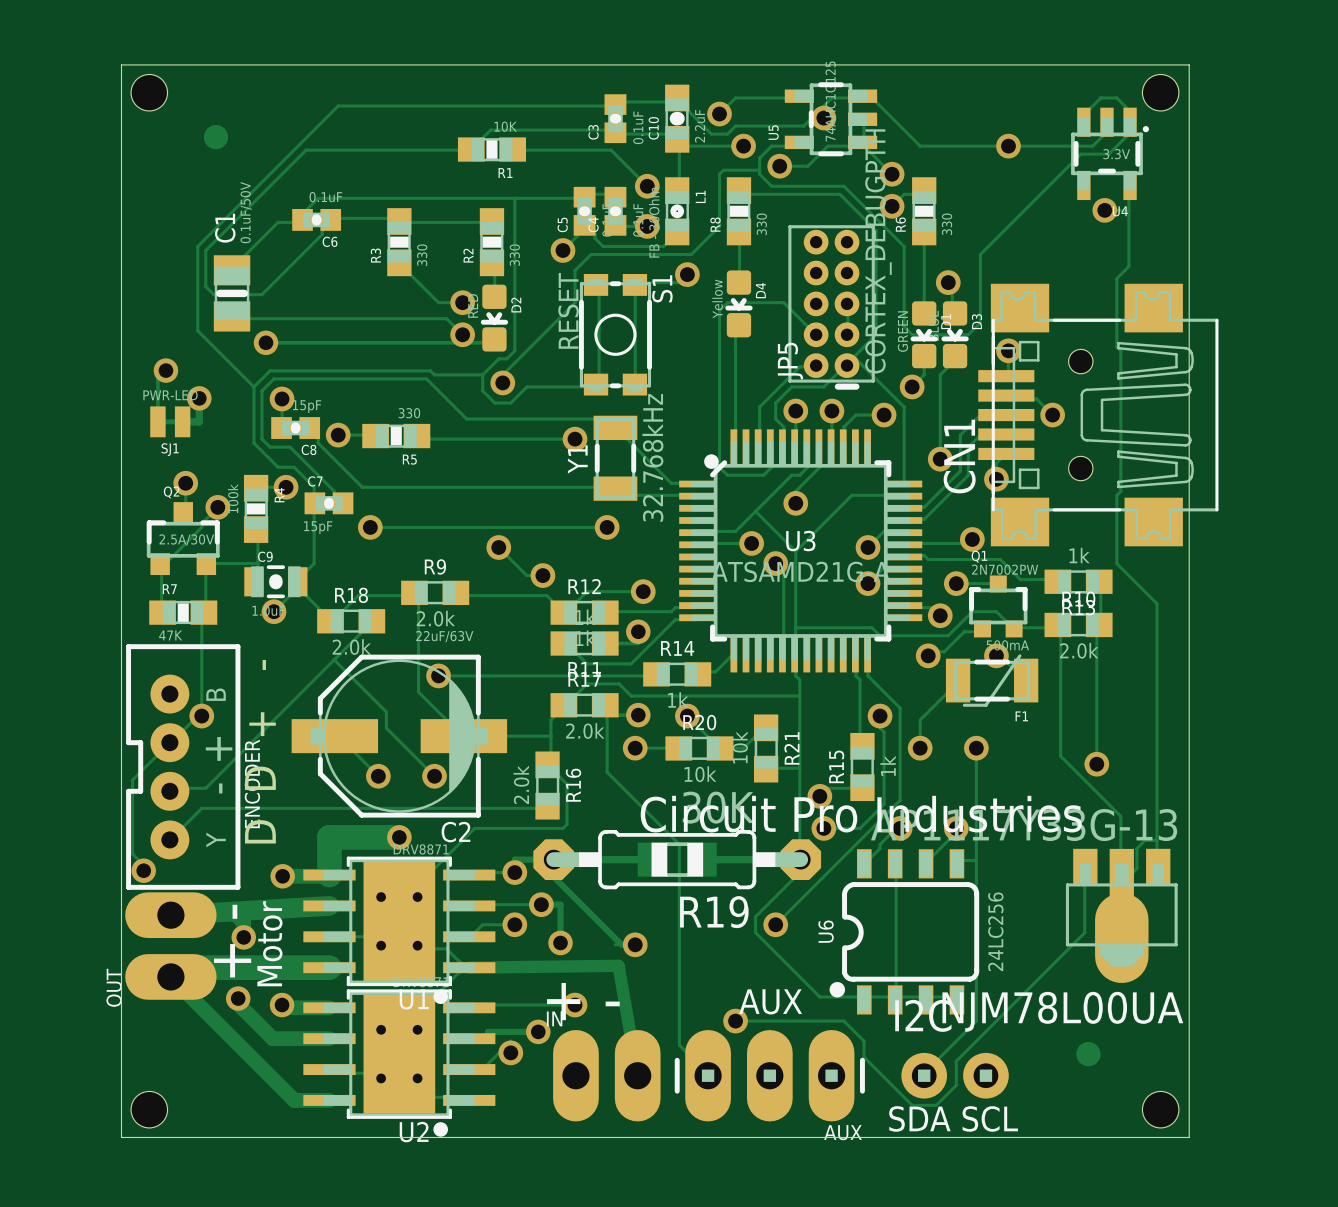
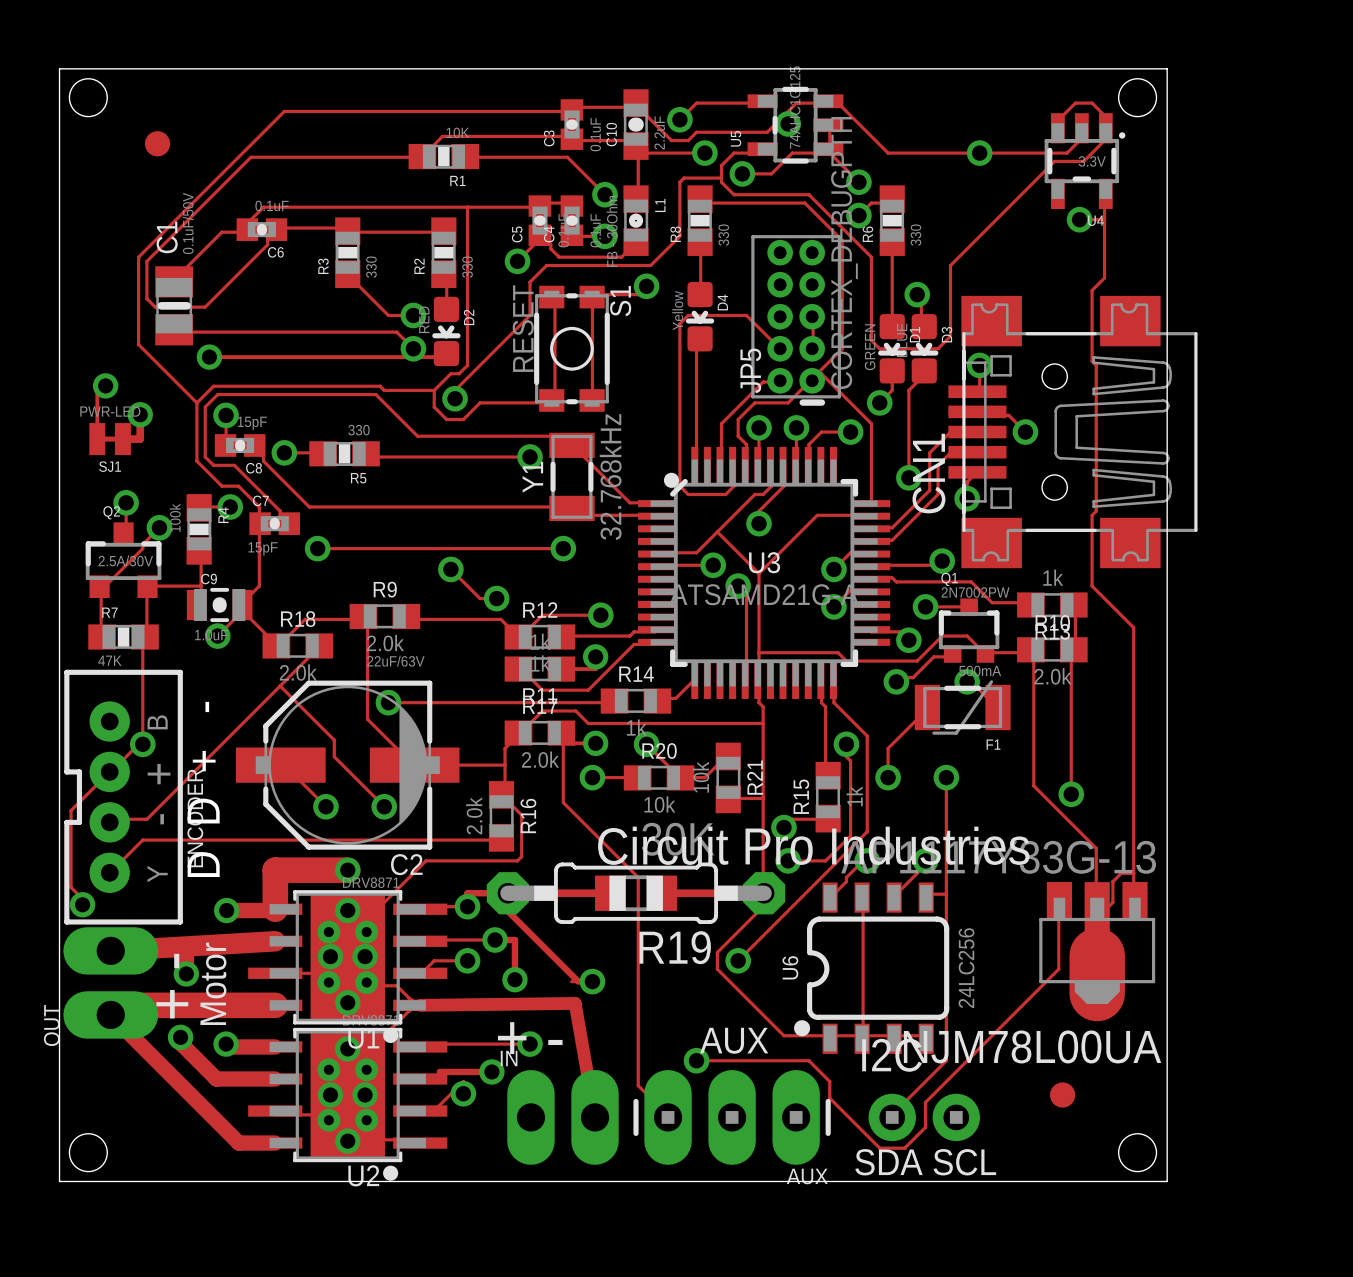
via: none -> (347, 910)
via: none -> (330, 956)
via: none -> (365, 956)
via: none -> (347, 1002)
via: none -> (347, 1048)
via: none -> (330, 1095)
via: none -> (365, 1095)
via: none -> (347, 1141)

